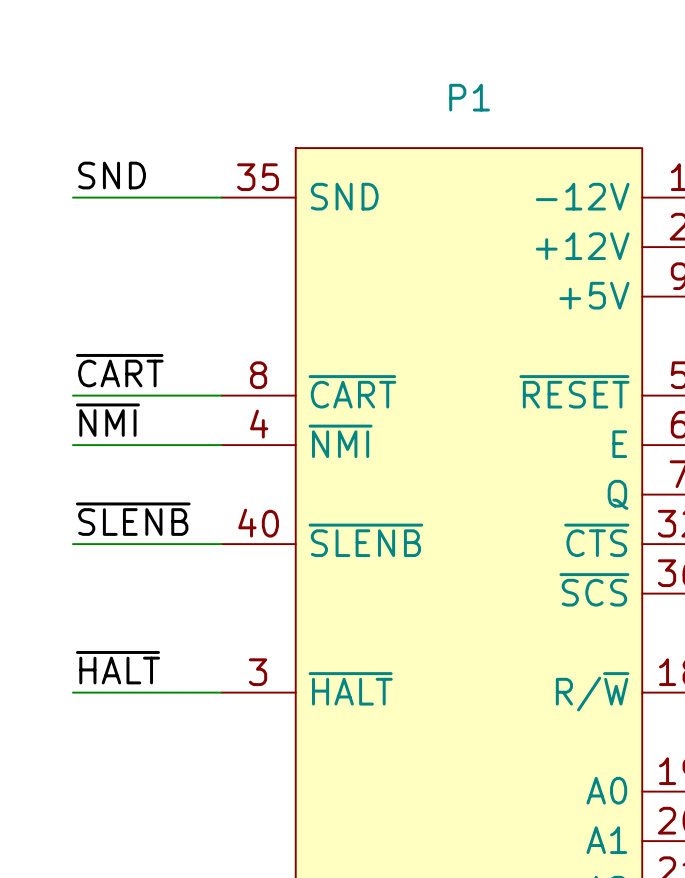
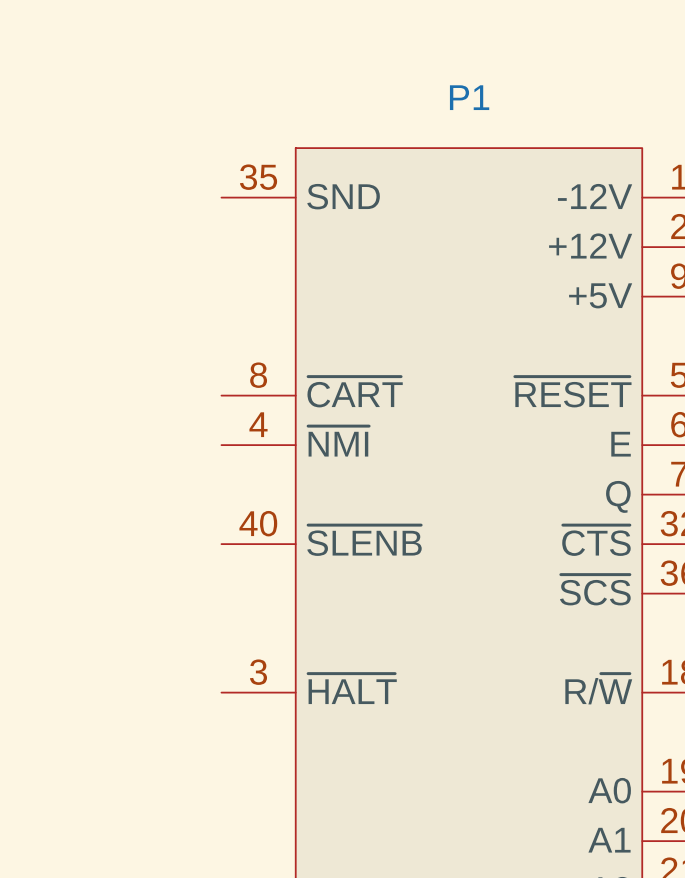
label: SND (112, 175) -> none
wire: (72, 197) (221, 197) -> none
label: ~{CART} (119, 370) -> none
wire: (72, 395) (221, 395) -> none
label: ~{NMI} (107, 420) -> none
wire: (72, 445) (221, 445) -> none
label: ~{SLENB} (133, 519) -> none
wire: (72, 544) (221, 544) -> none
label: ~{HALT} (118, 667) -> none
wire: (72, 692) (221, 692) -> none

